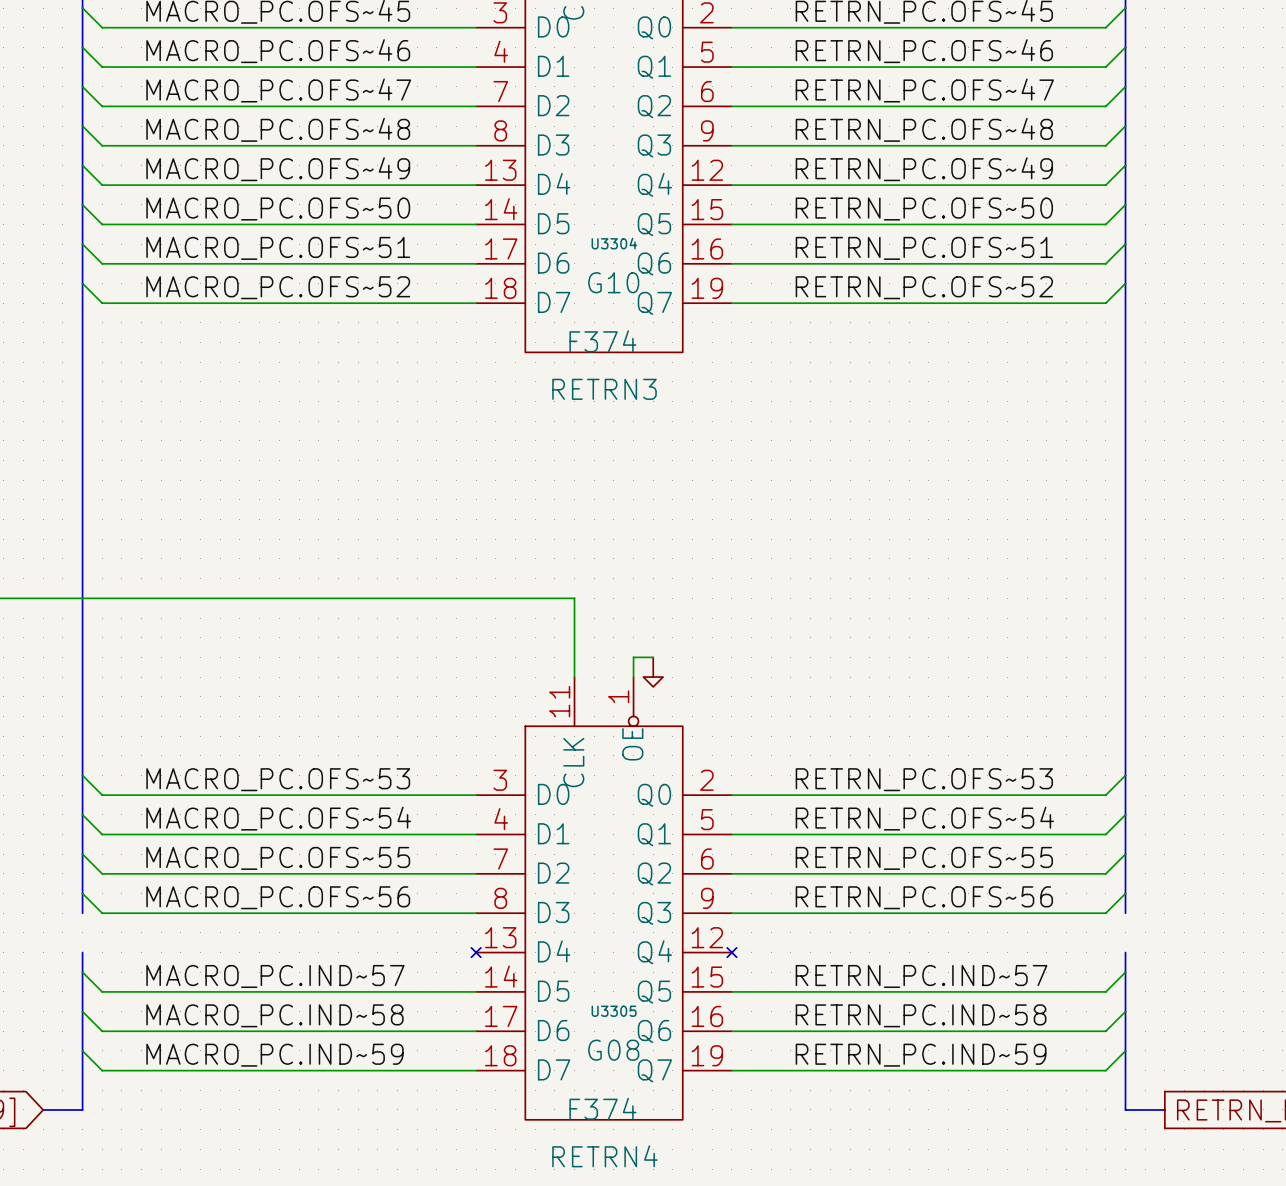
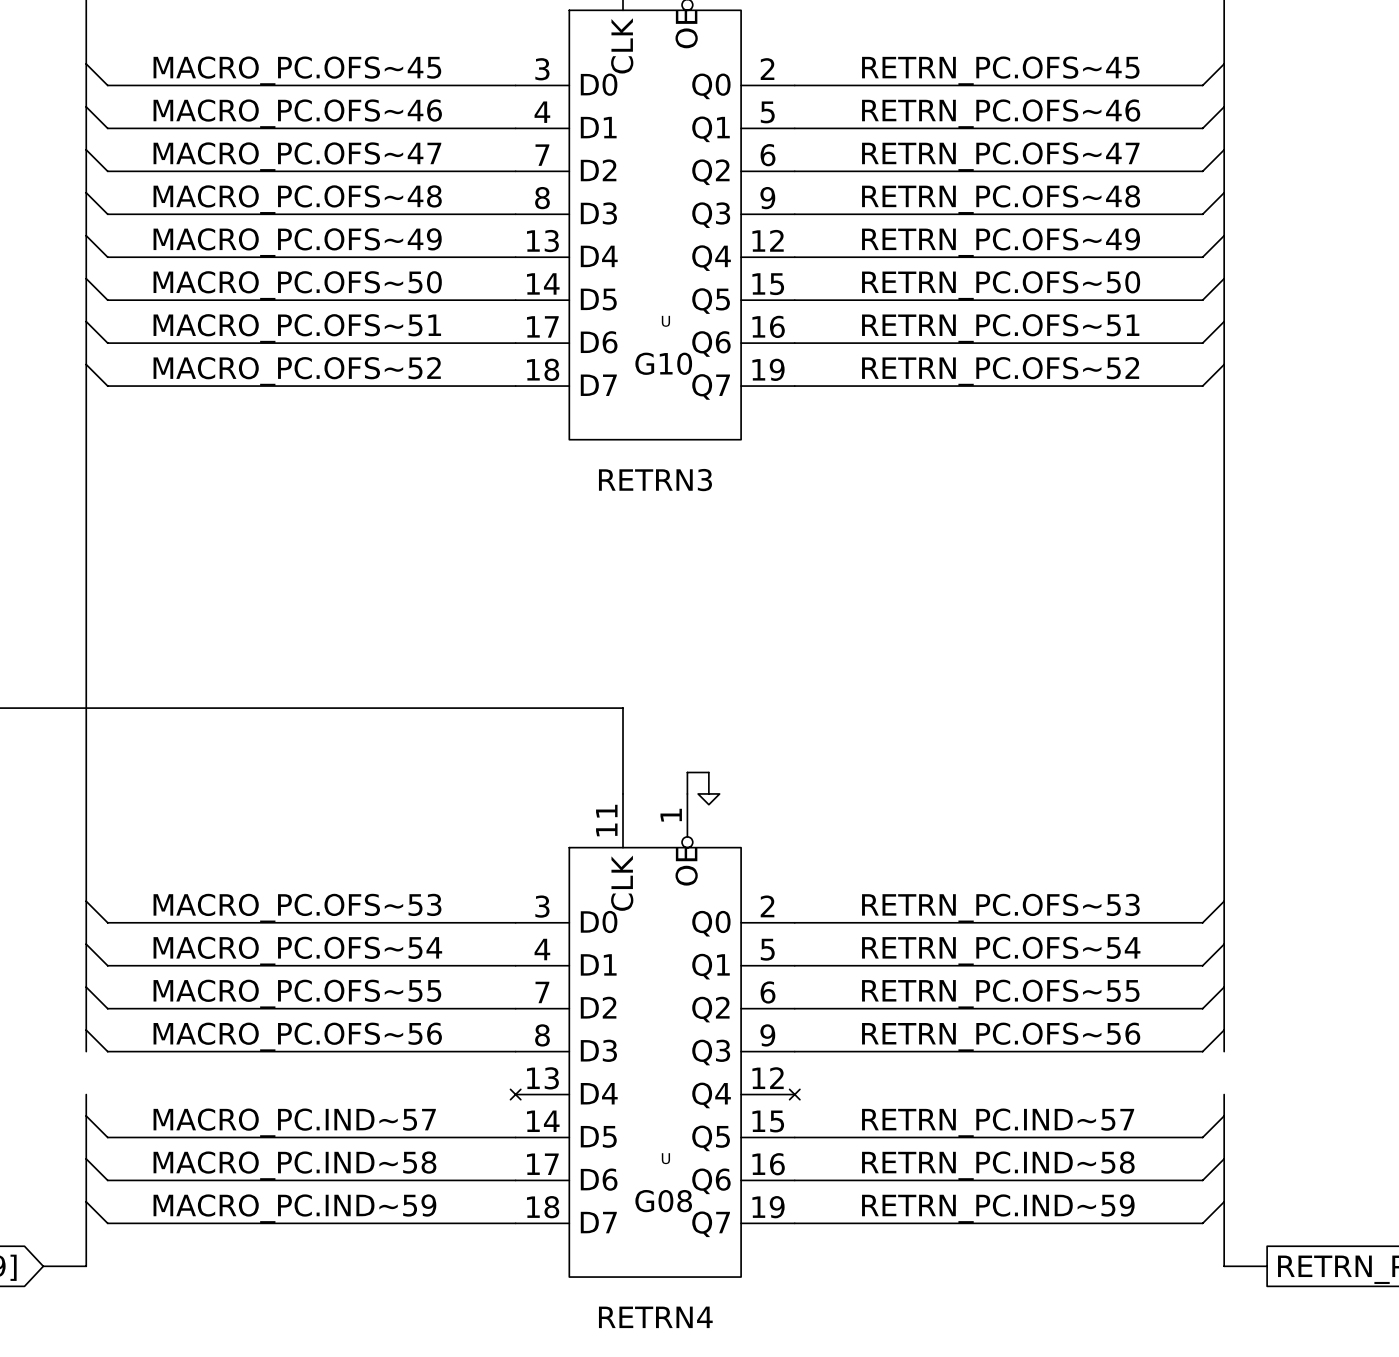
U3304 name: U3304 (614, 243) -> U (665, 321)
U3304 value: F374 (602, 341) -> none
U3305 name: U3305 (614, 1011) -> U (665, 1158)
U3305 value: F374 (602, 1108) -> none

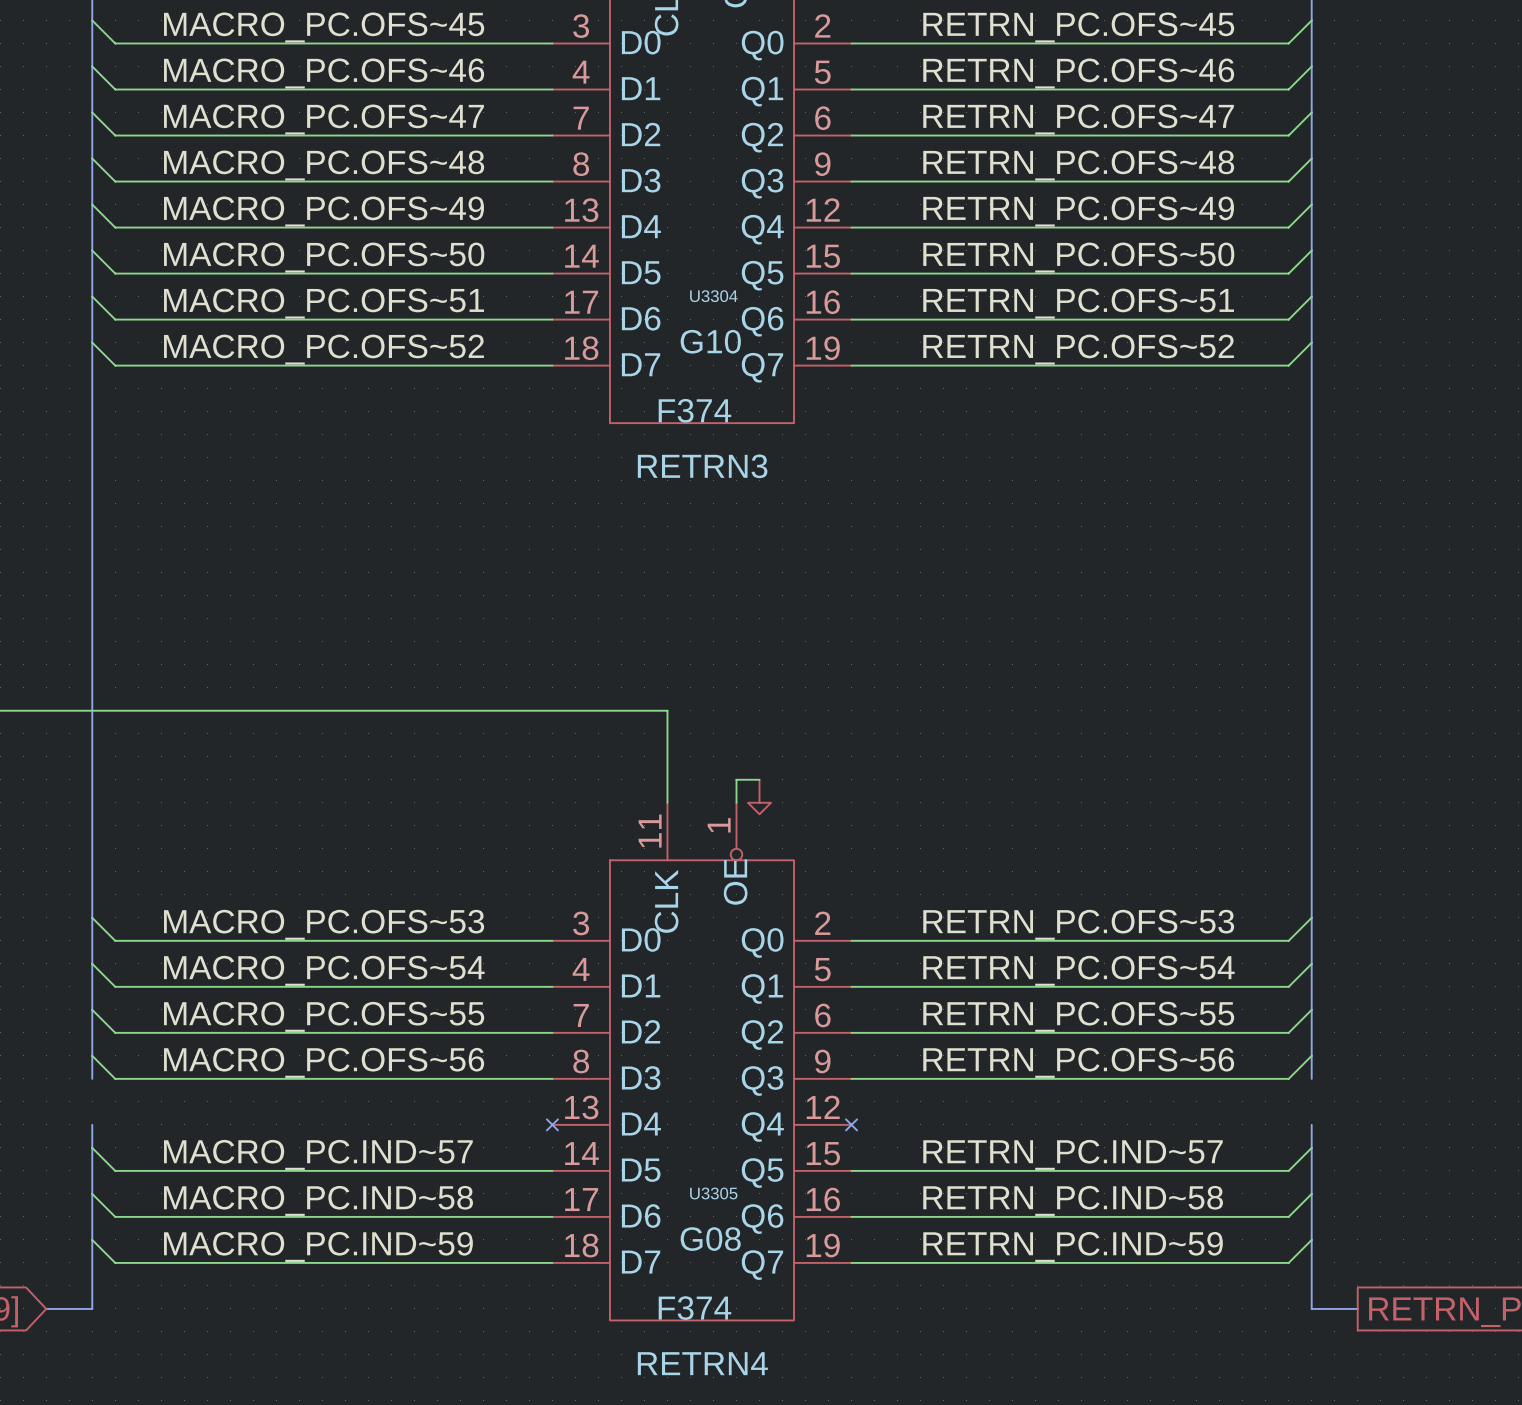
U name: U (665, 321) -> U3304 (713, 296)
U value: none -> F374 (694, 410)
U name: U (665, 1158) -> U3305 (713, 1193)
U value: none -> F374 (694, 1308)

